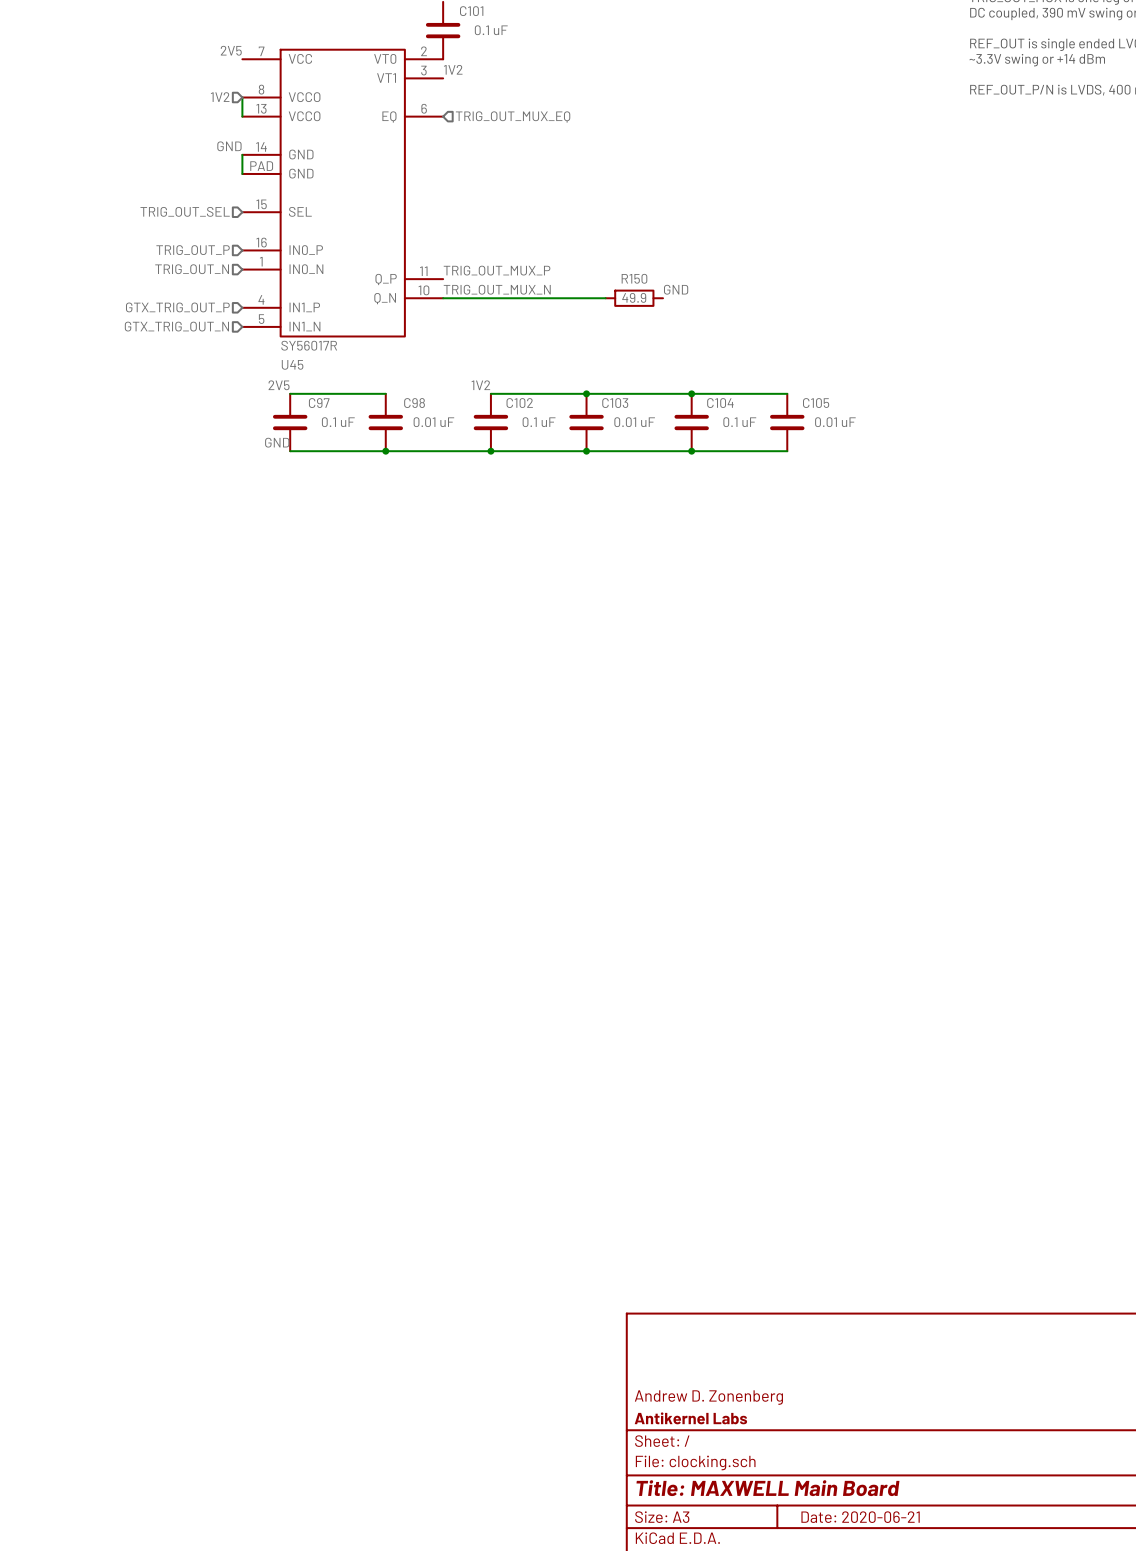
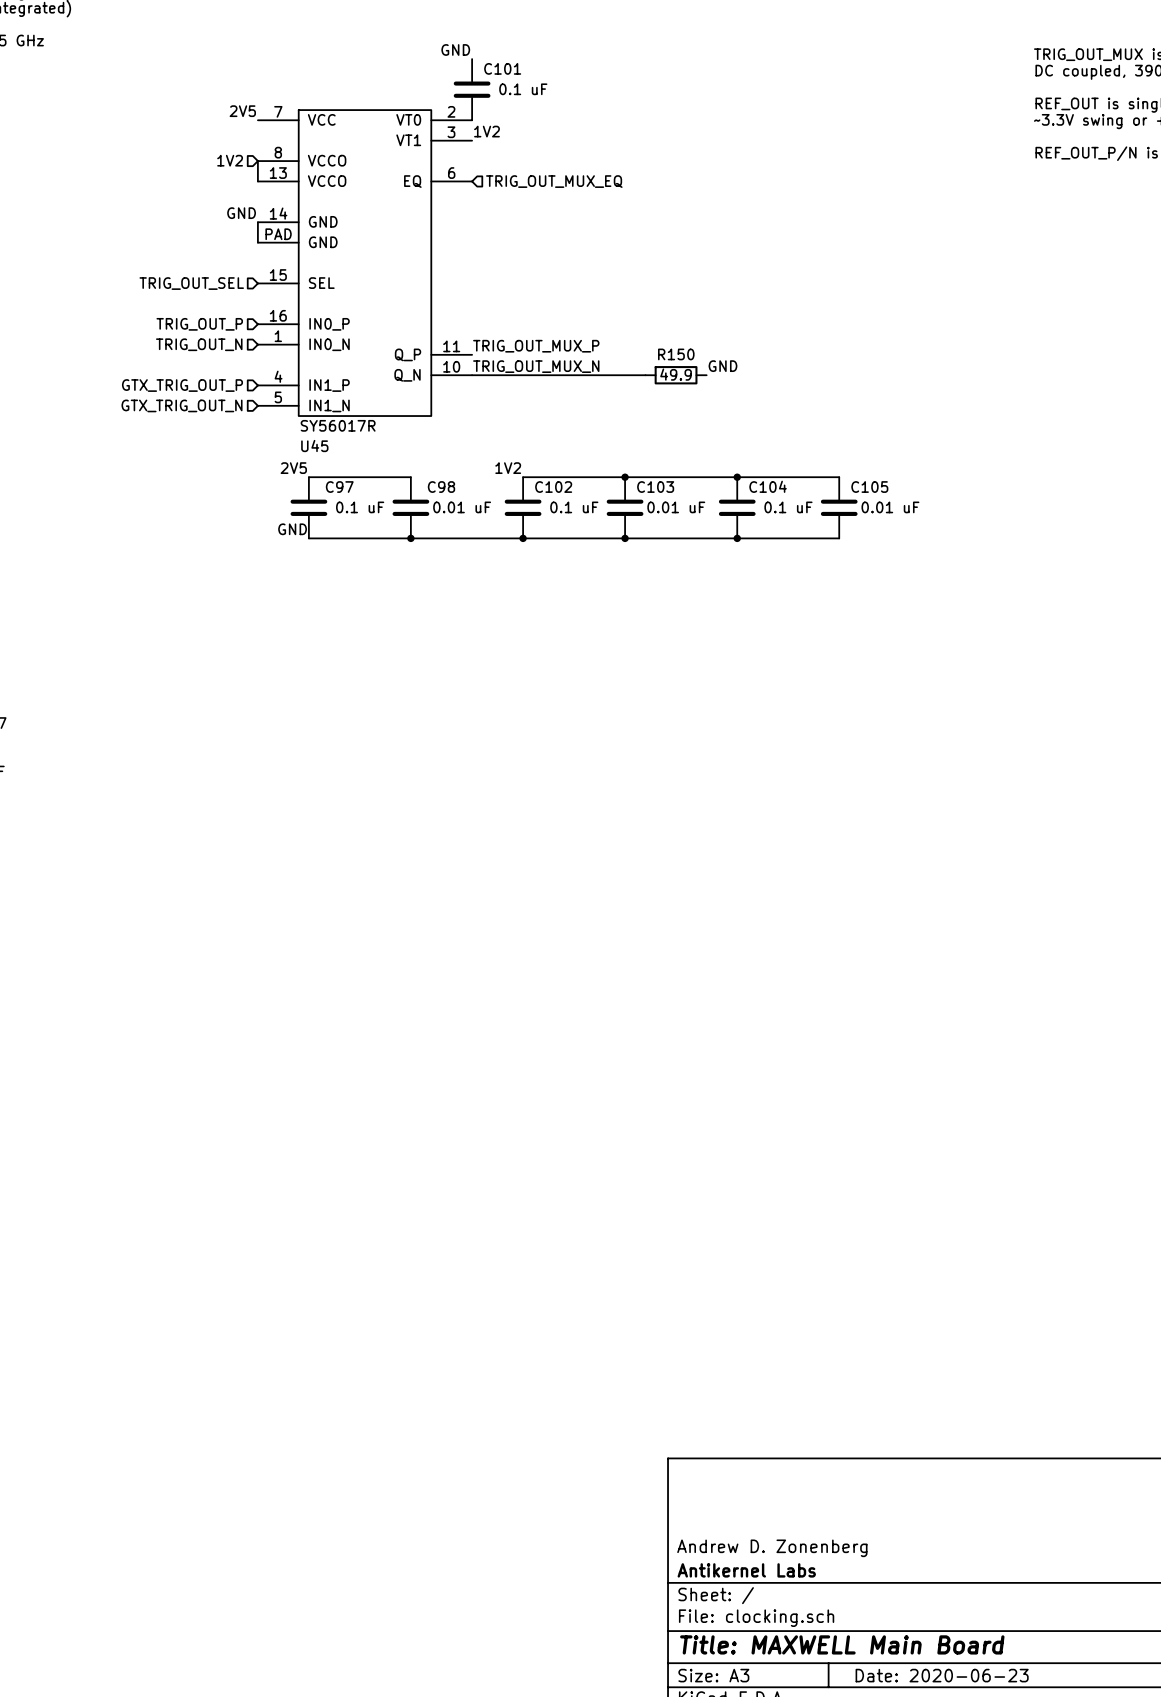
title block: Date: 2020-06-21 (860, 1517) -> Date: 2020-06-23 (942, 1675)

